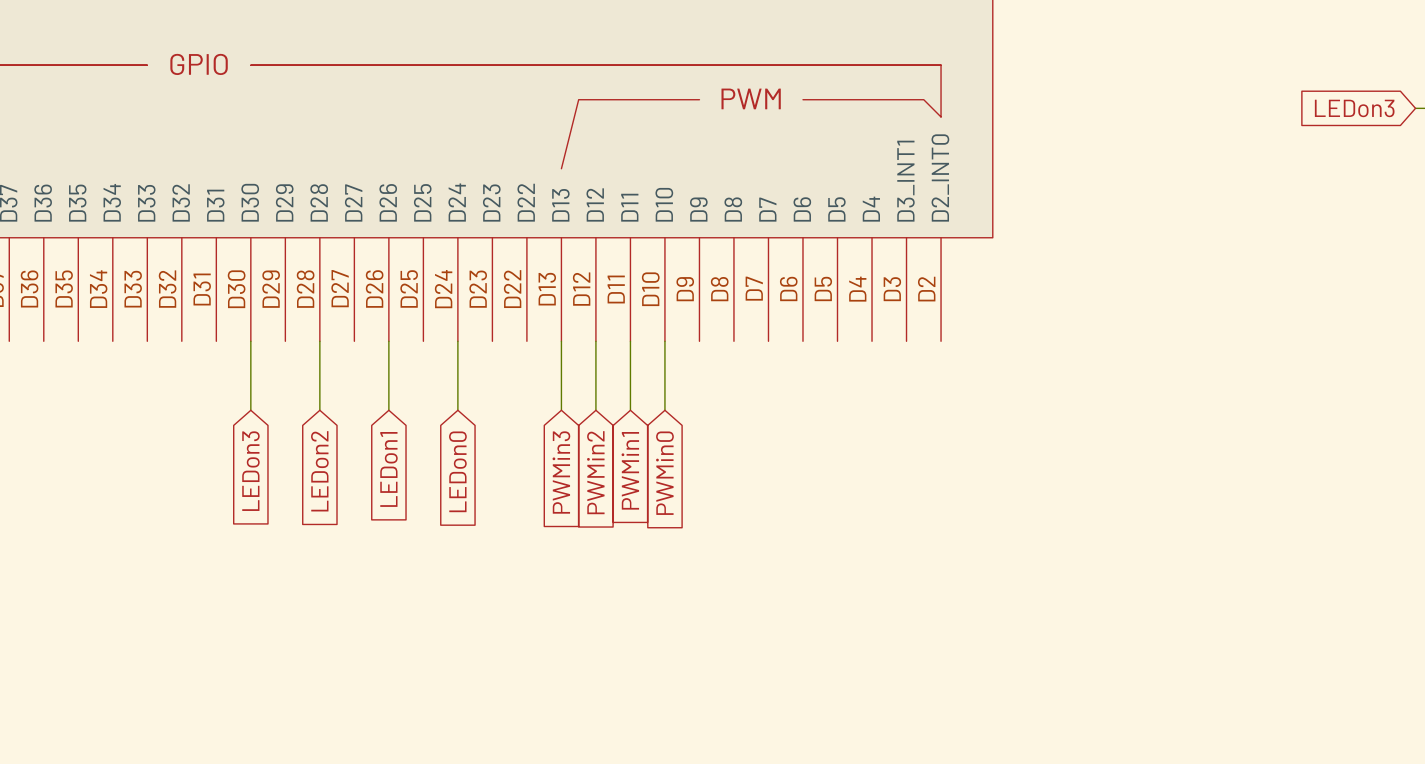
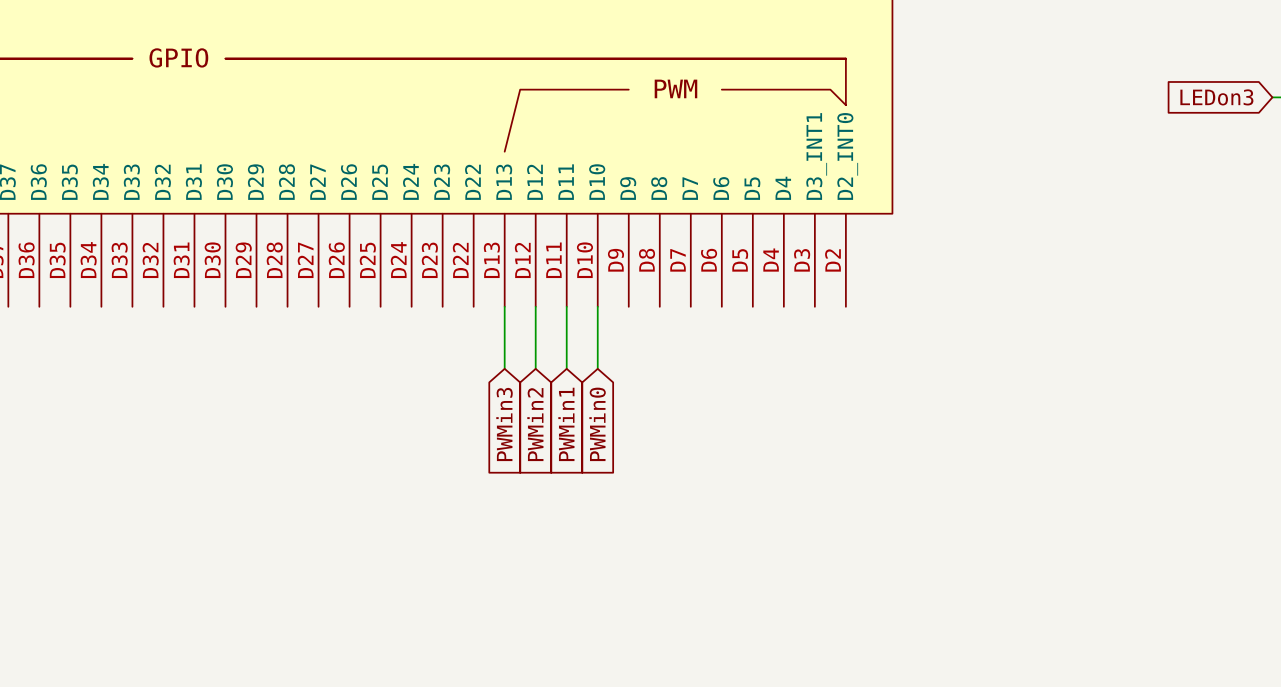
wire: (250, 341) (250, 410) -> none
wire: (319, 341) (319, 410) -> none
wire: (388, 341) (388, 410) -> none
wire: (457, 341) (457, 410) -> none
global label: LEDon1 (388, 469) -> none
global label: LEDon3 (250, 471) -> none
global label: LEDon2 (319, 471) -> none
global label: LEDon0 (457, 471) -> none

